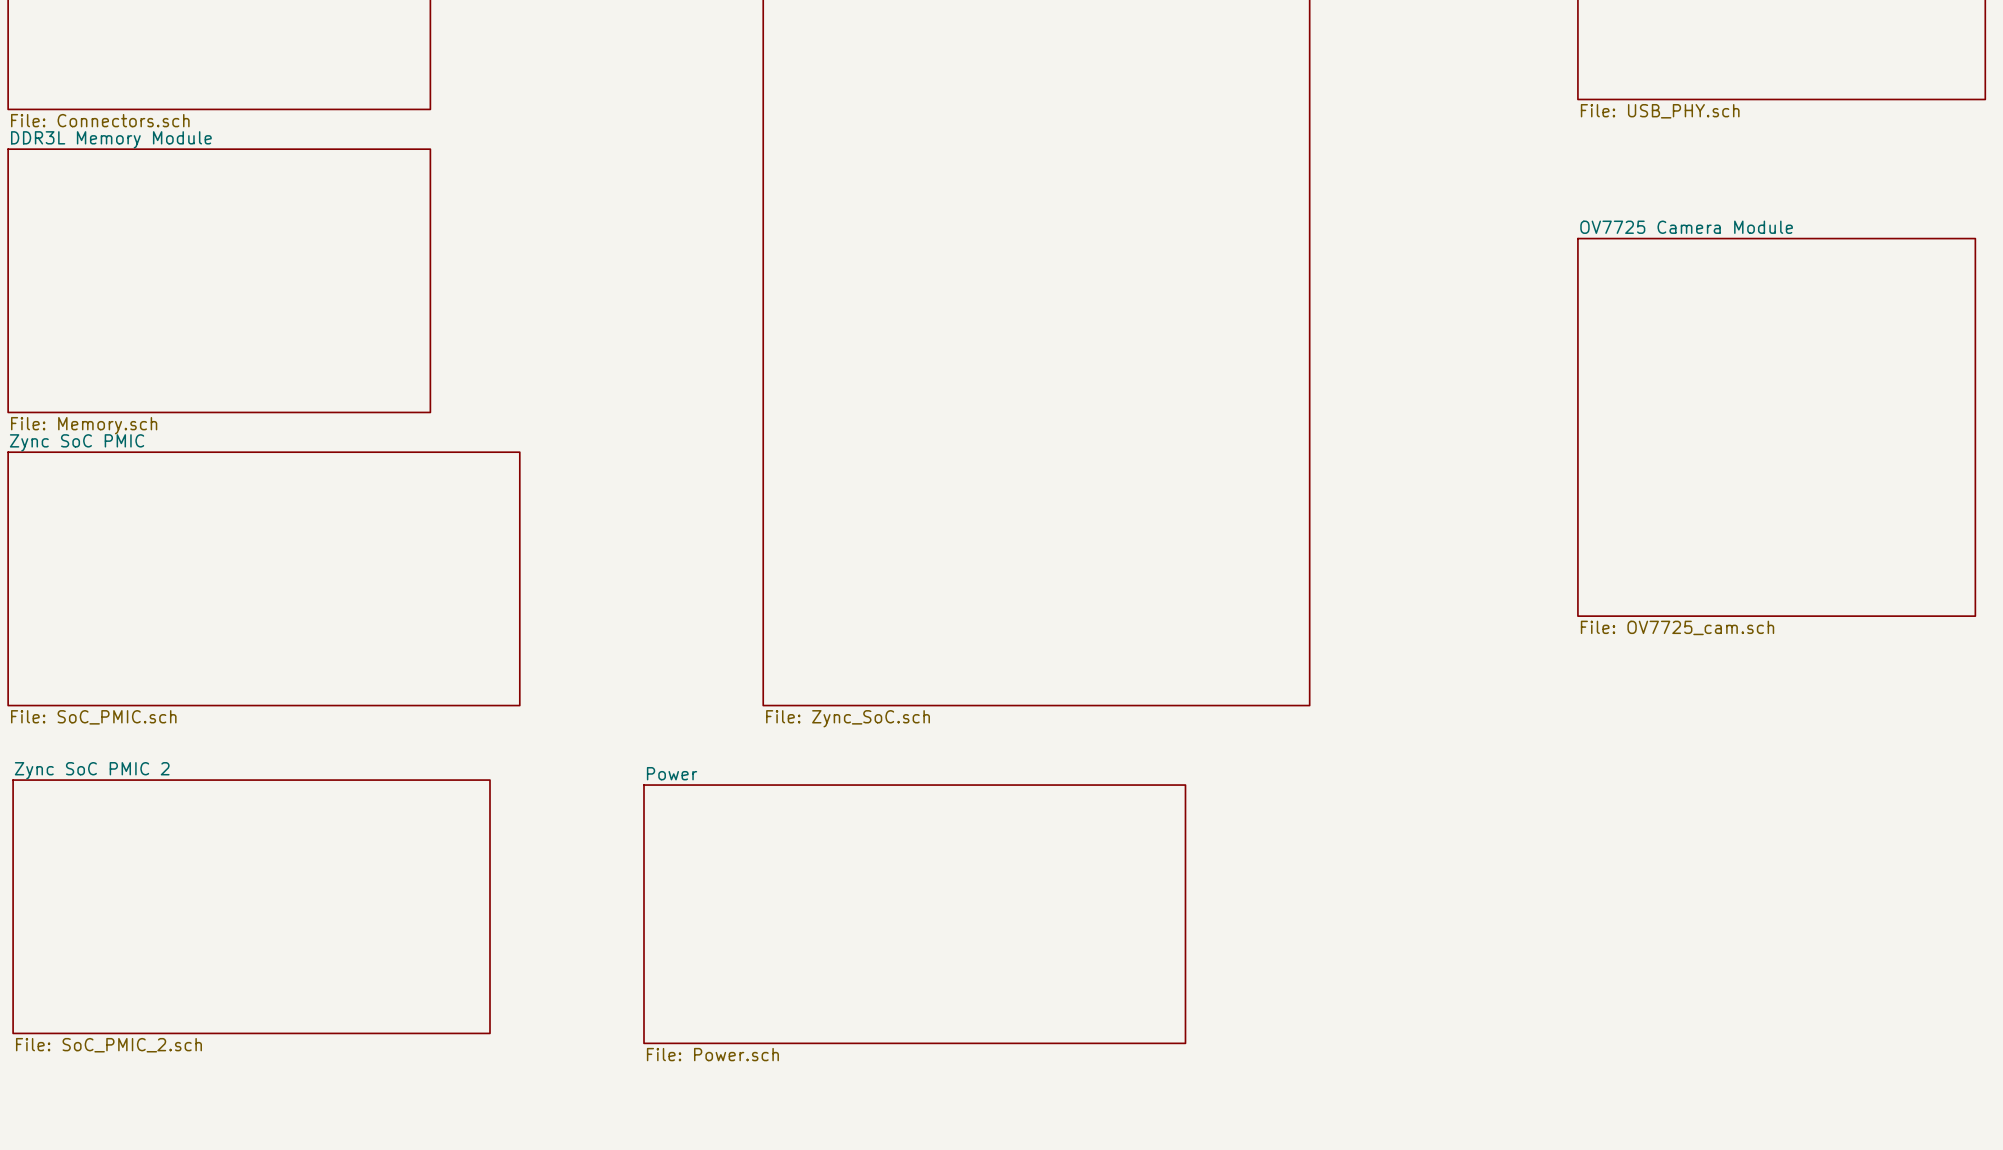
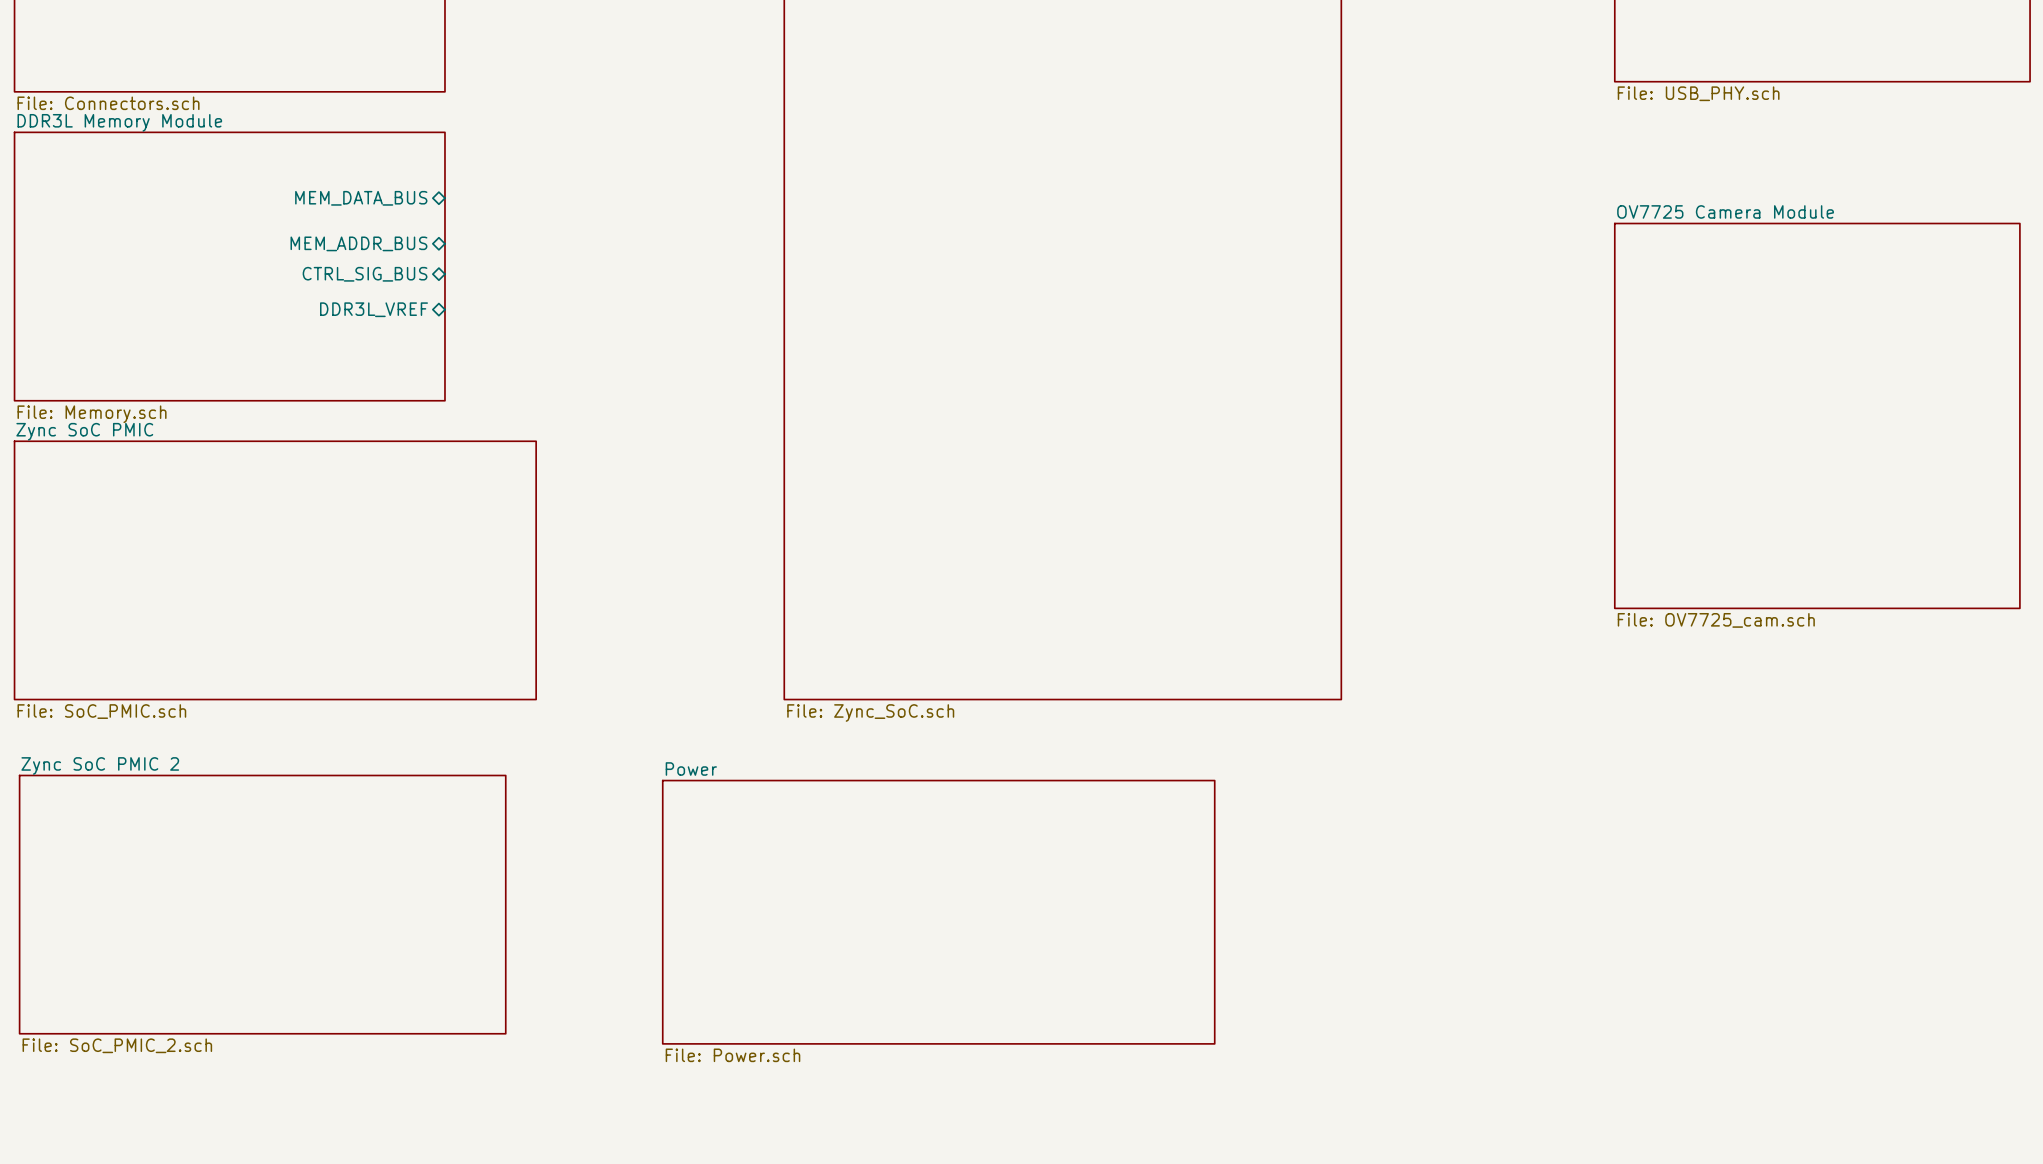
sheet pin: none -> MEM_DATA_BUS (361, 198)
sheet pin: none -> MEM_ADDR_BUS (358, 243)
sheet pin: none -> CTRL_SIG_BUS (365, 274)
sheet pin: none -> DDR3L_VREF (374, 309)

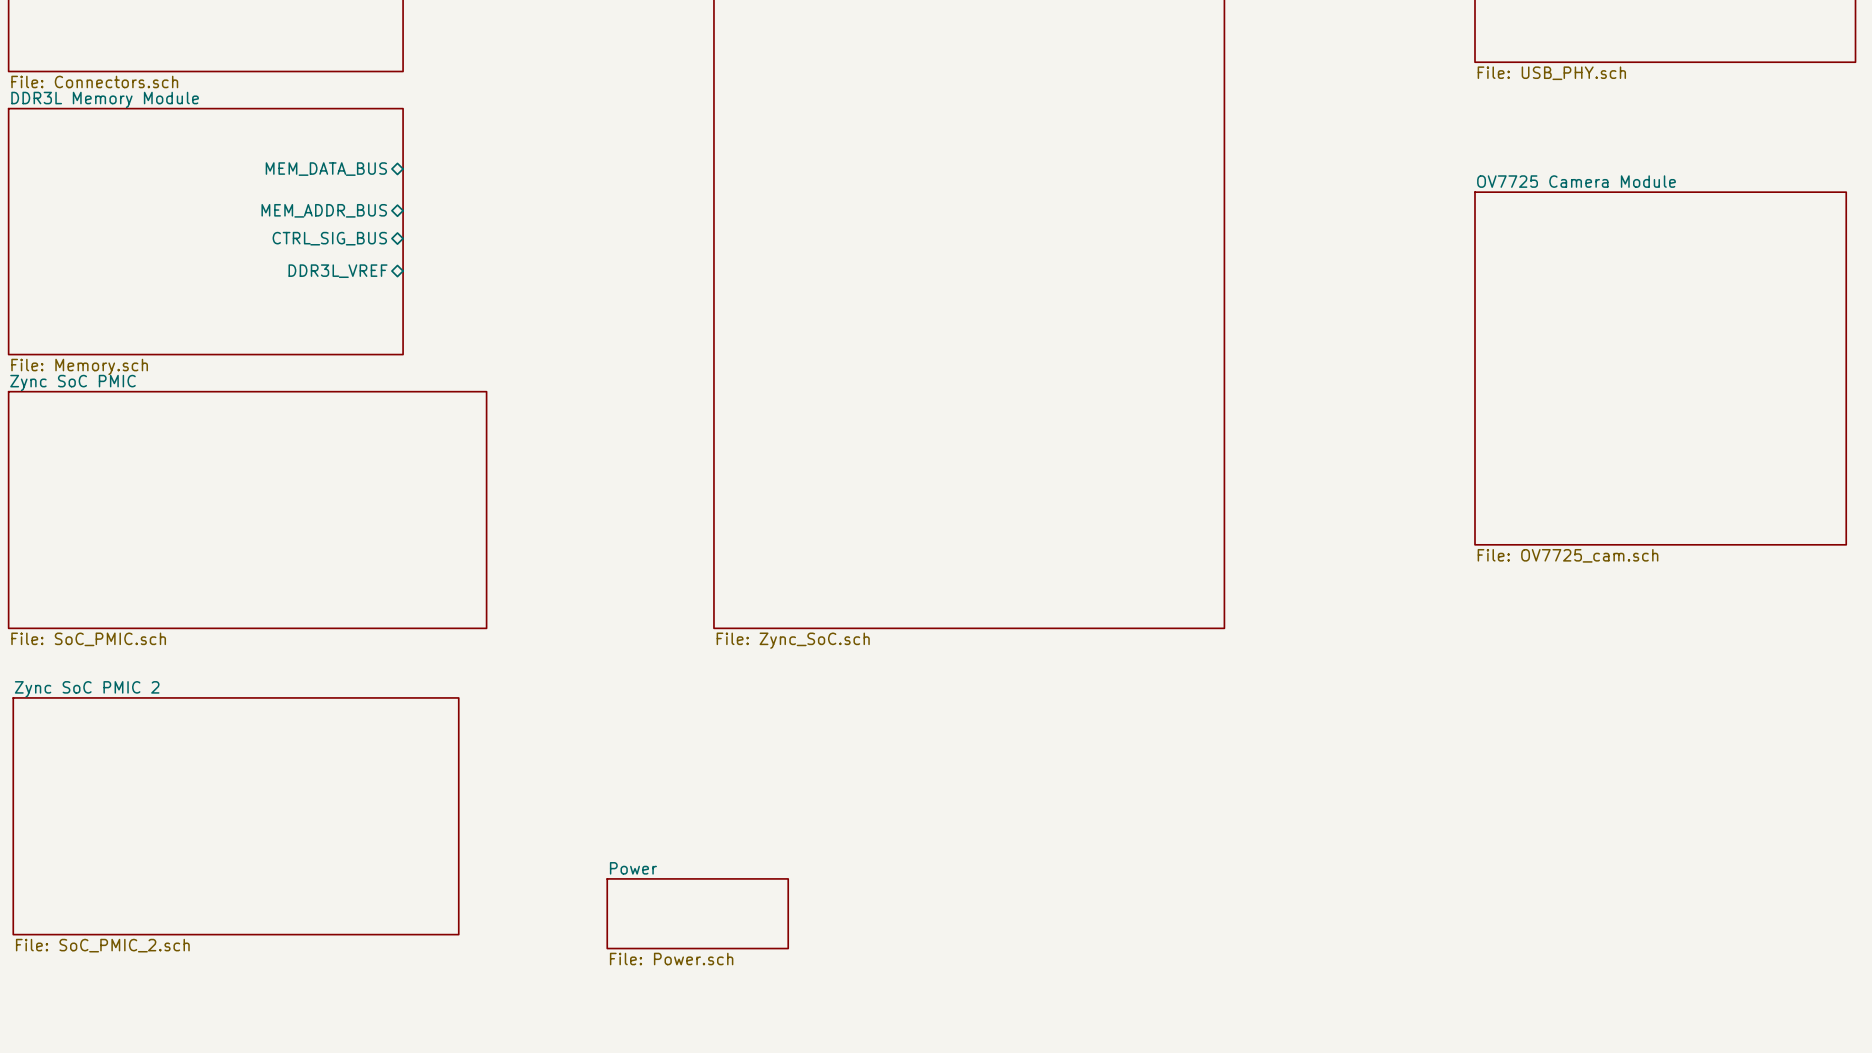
sheet Power: File: Power.sch (938, 912) -> none
sheet Power: none -> File: Power.sch (697, 913)

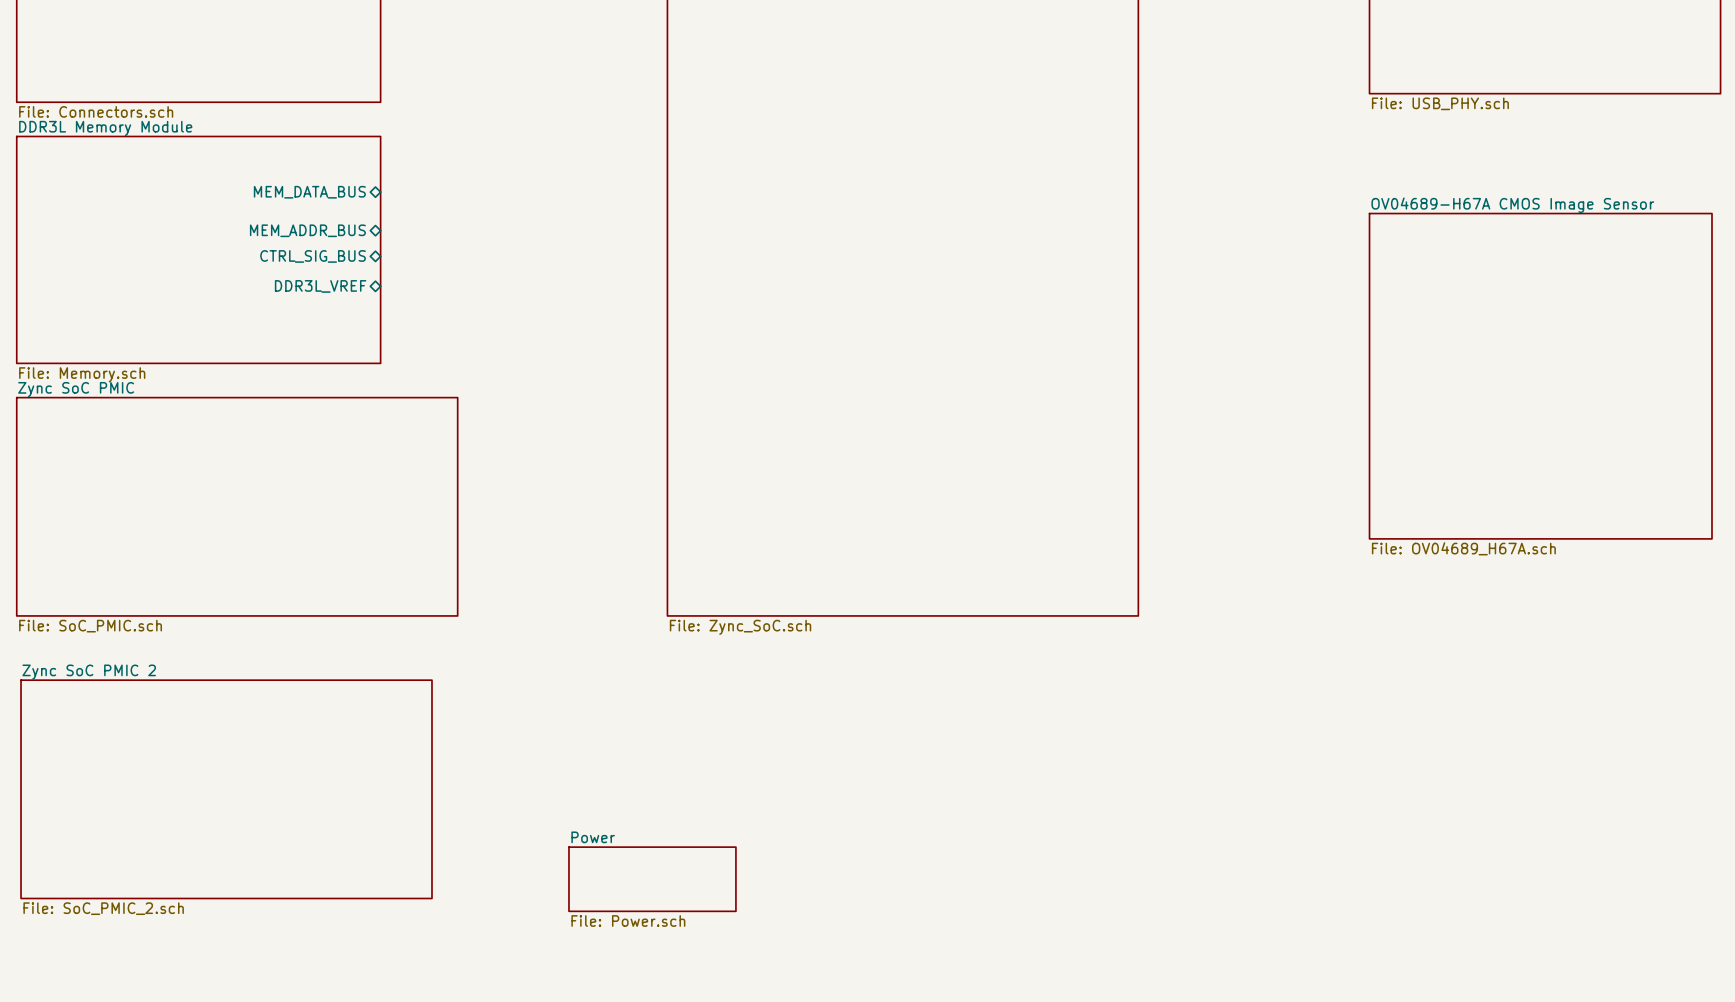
sheet OV7725 Camera Module name: OV7725 Camera Module (1576, 181) -> OV04689-H67A CMOS Image Sensor (1512, 205)
sheet OV7725 Camera Module value: File: OV7725_cam.sch (1568, 555) -> File: OV04689_H67A.sch (1463, 548)

